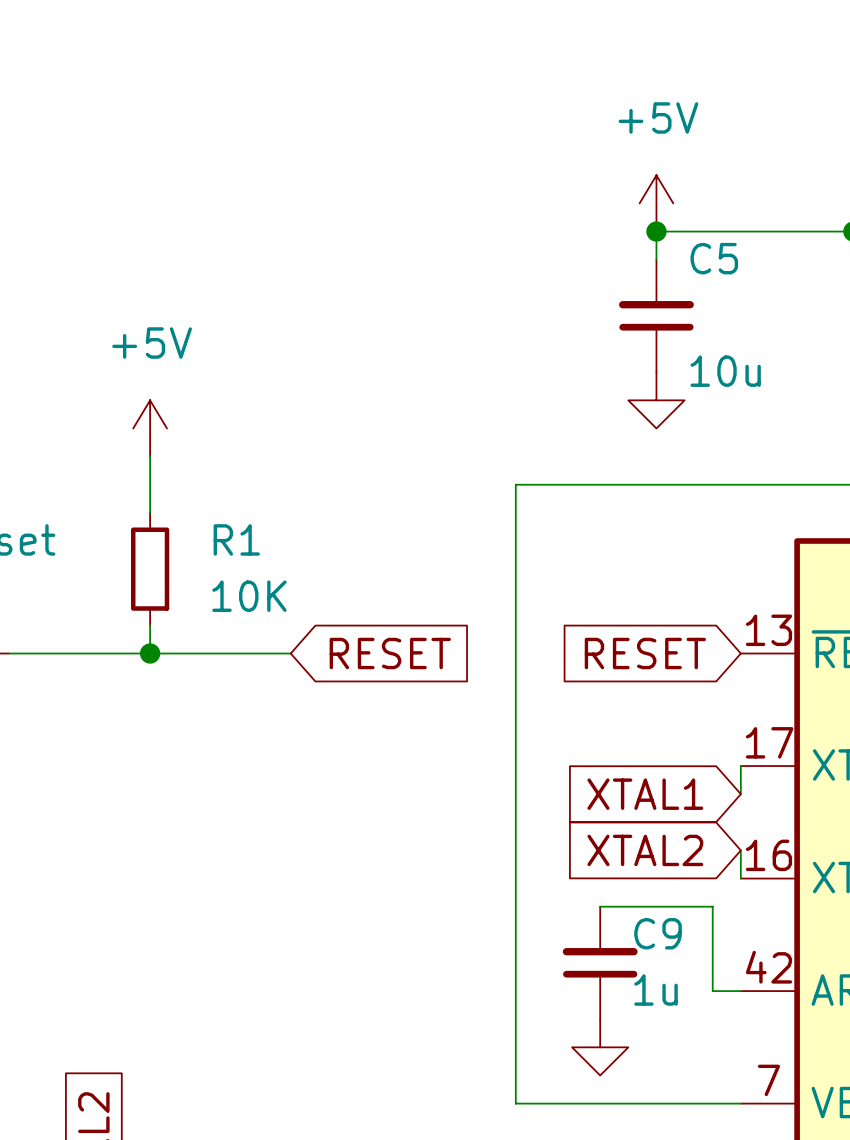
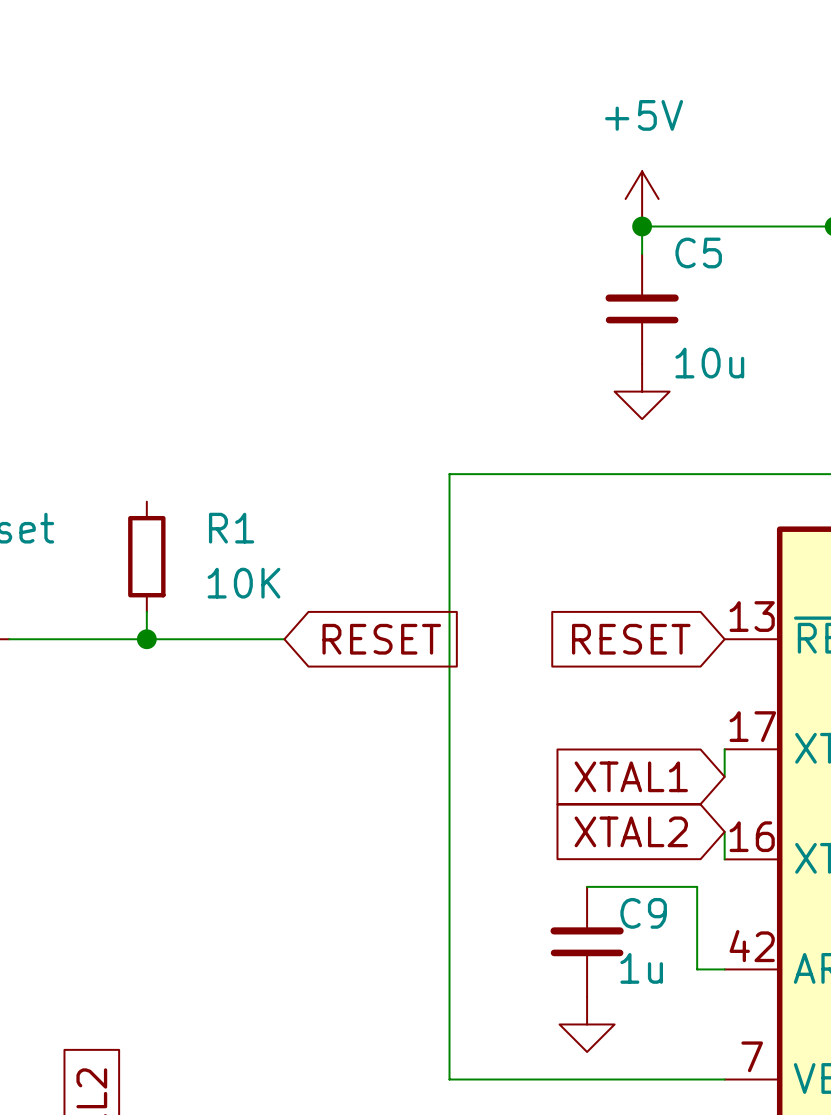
power symbol: +5V (150, 428) -> none
wire: (150, 456) (150, 512) -> none
wire: (515, 484) (515, 1103) -> (504, 474) (449, 474) (449, 1079) (504, 1079)

